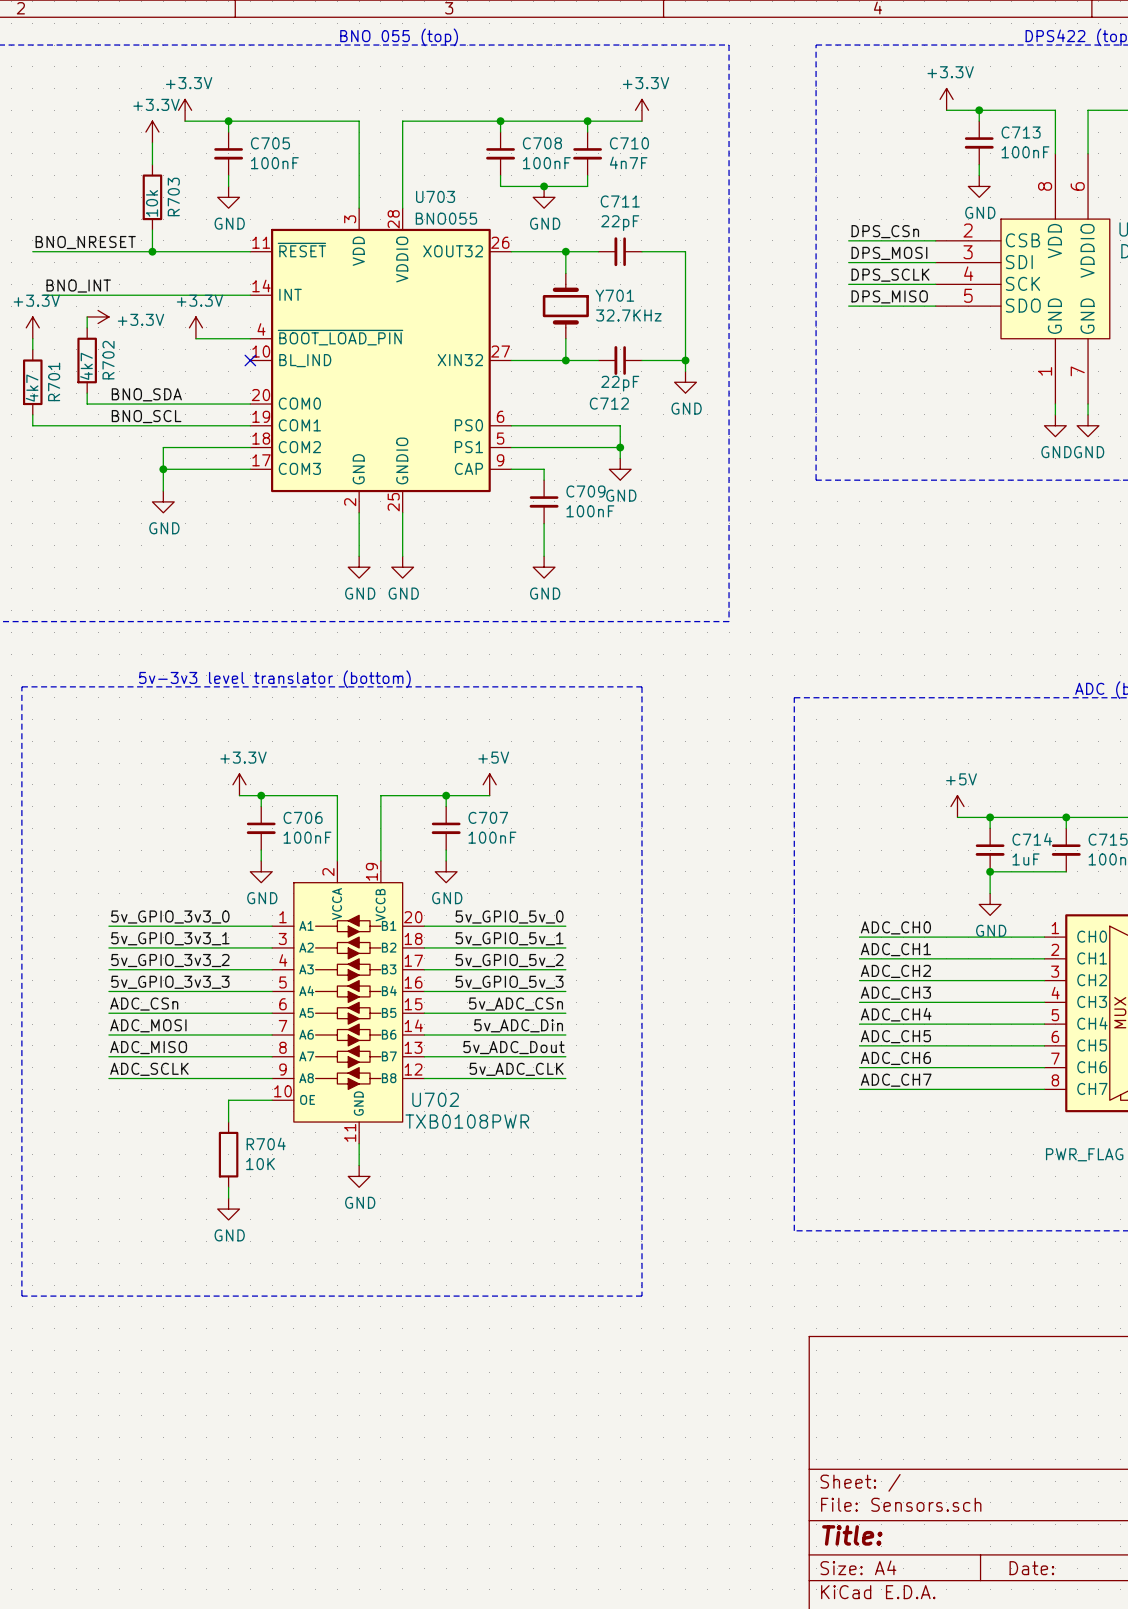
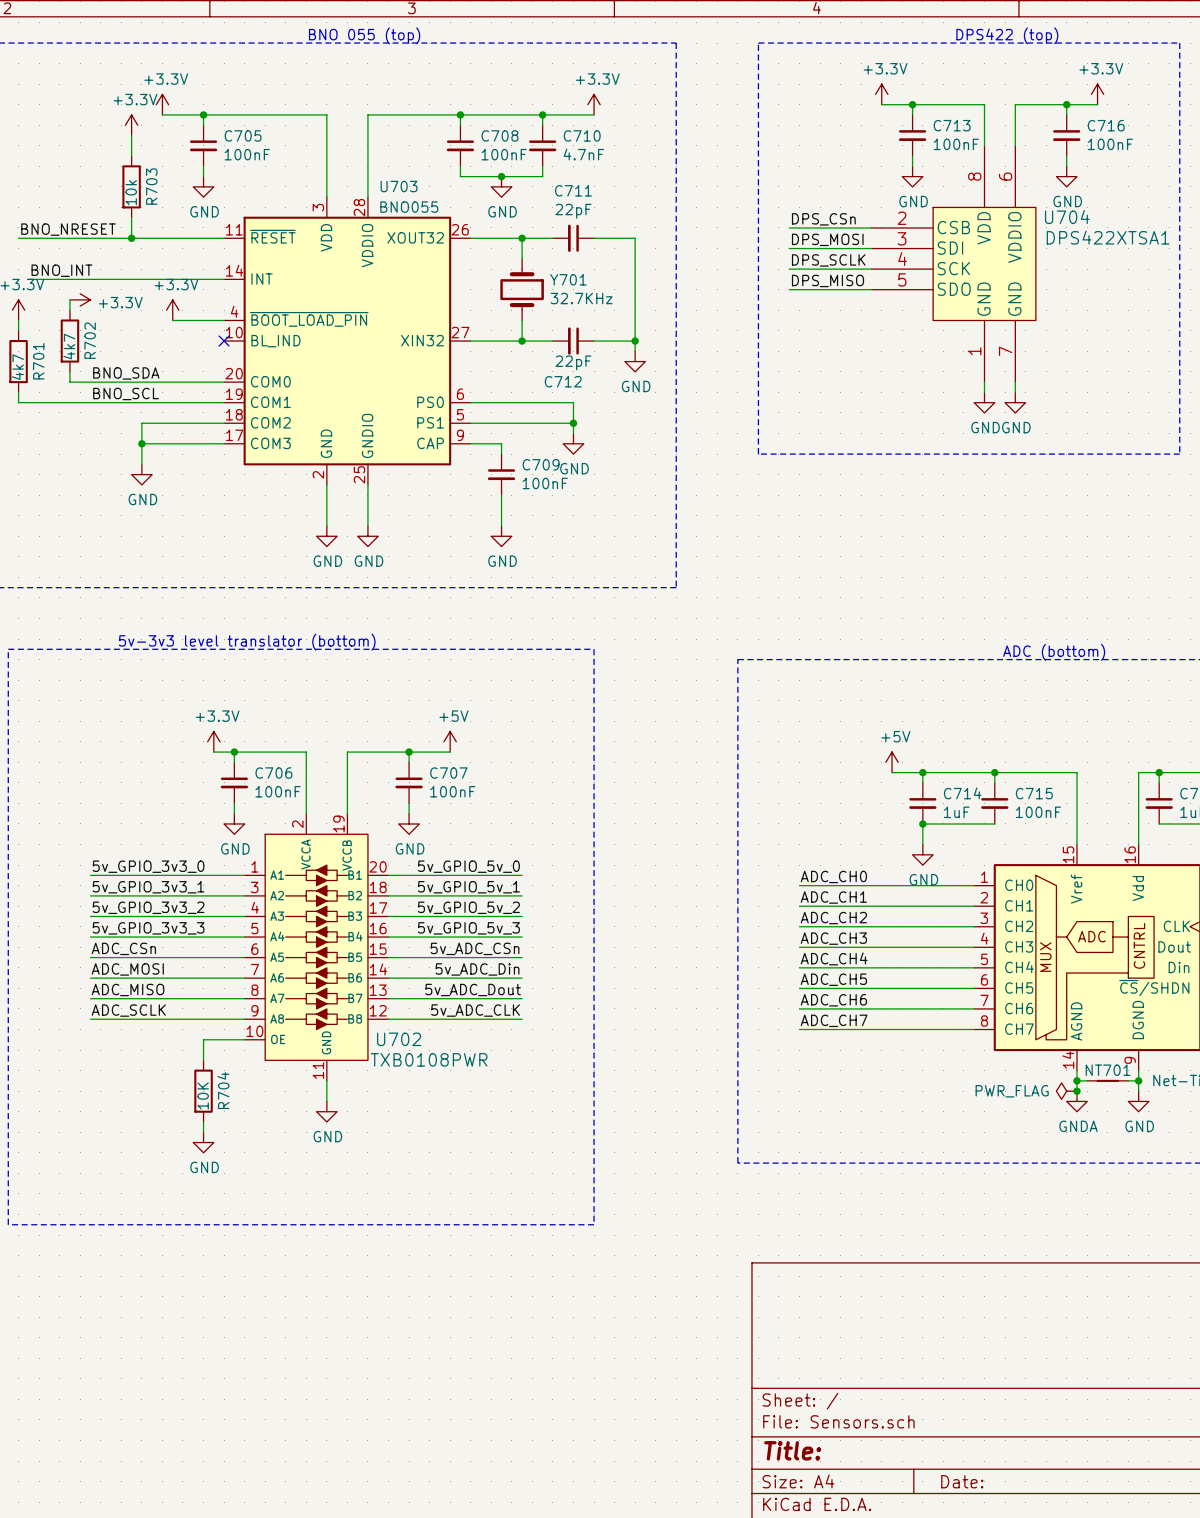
C710 value: 4n7F (628, 162) -> 4.7nF (583, 154)
R704 name rotation: 0° (266, 1143) -> 90° counterclockwise (223, 1090)
R704 value rotation: 0° (260, 1164) -> 90° counterclockwise (203, 1095)

